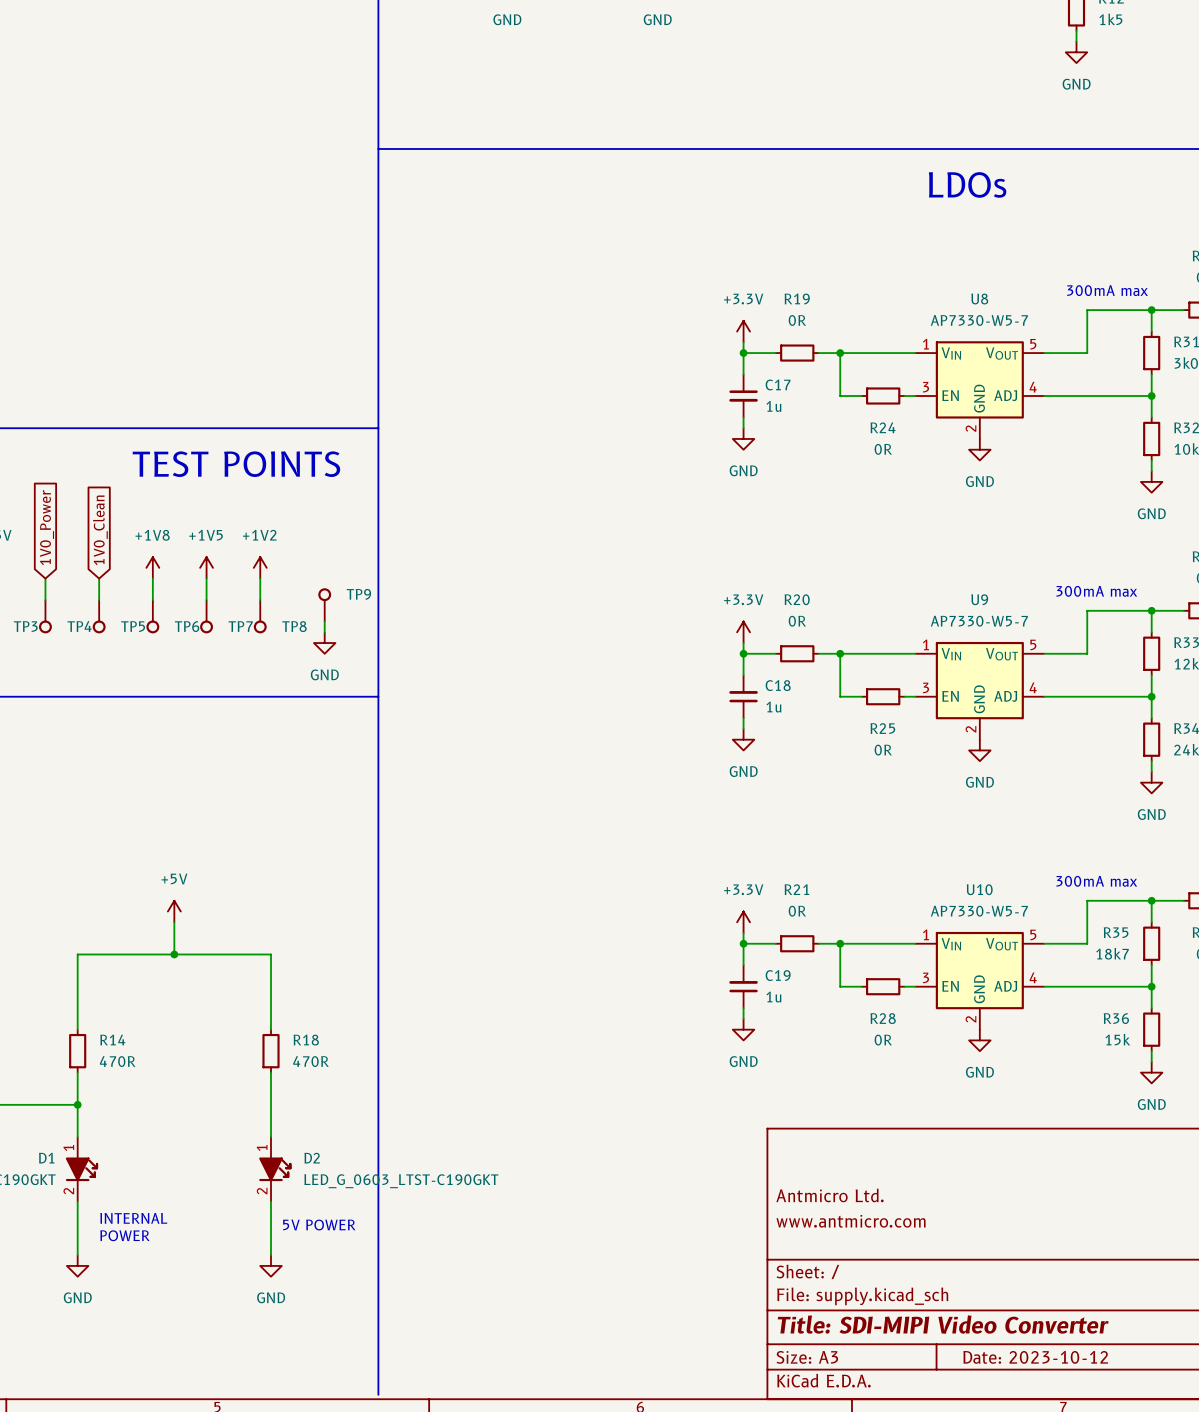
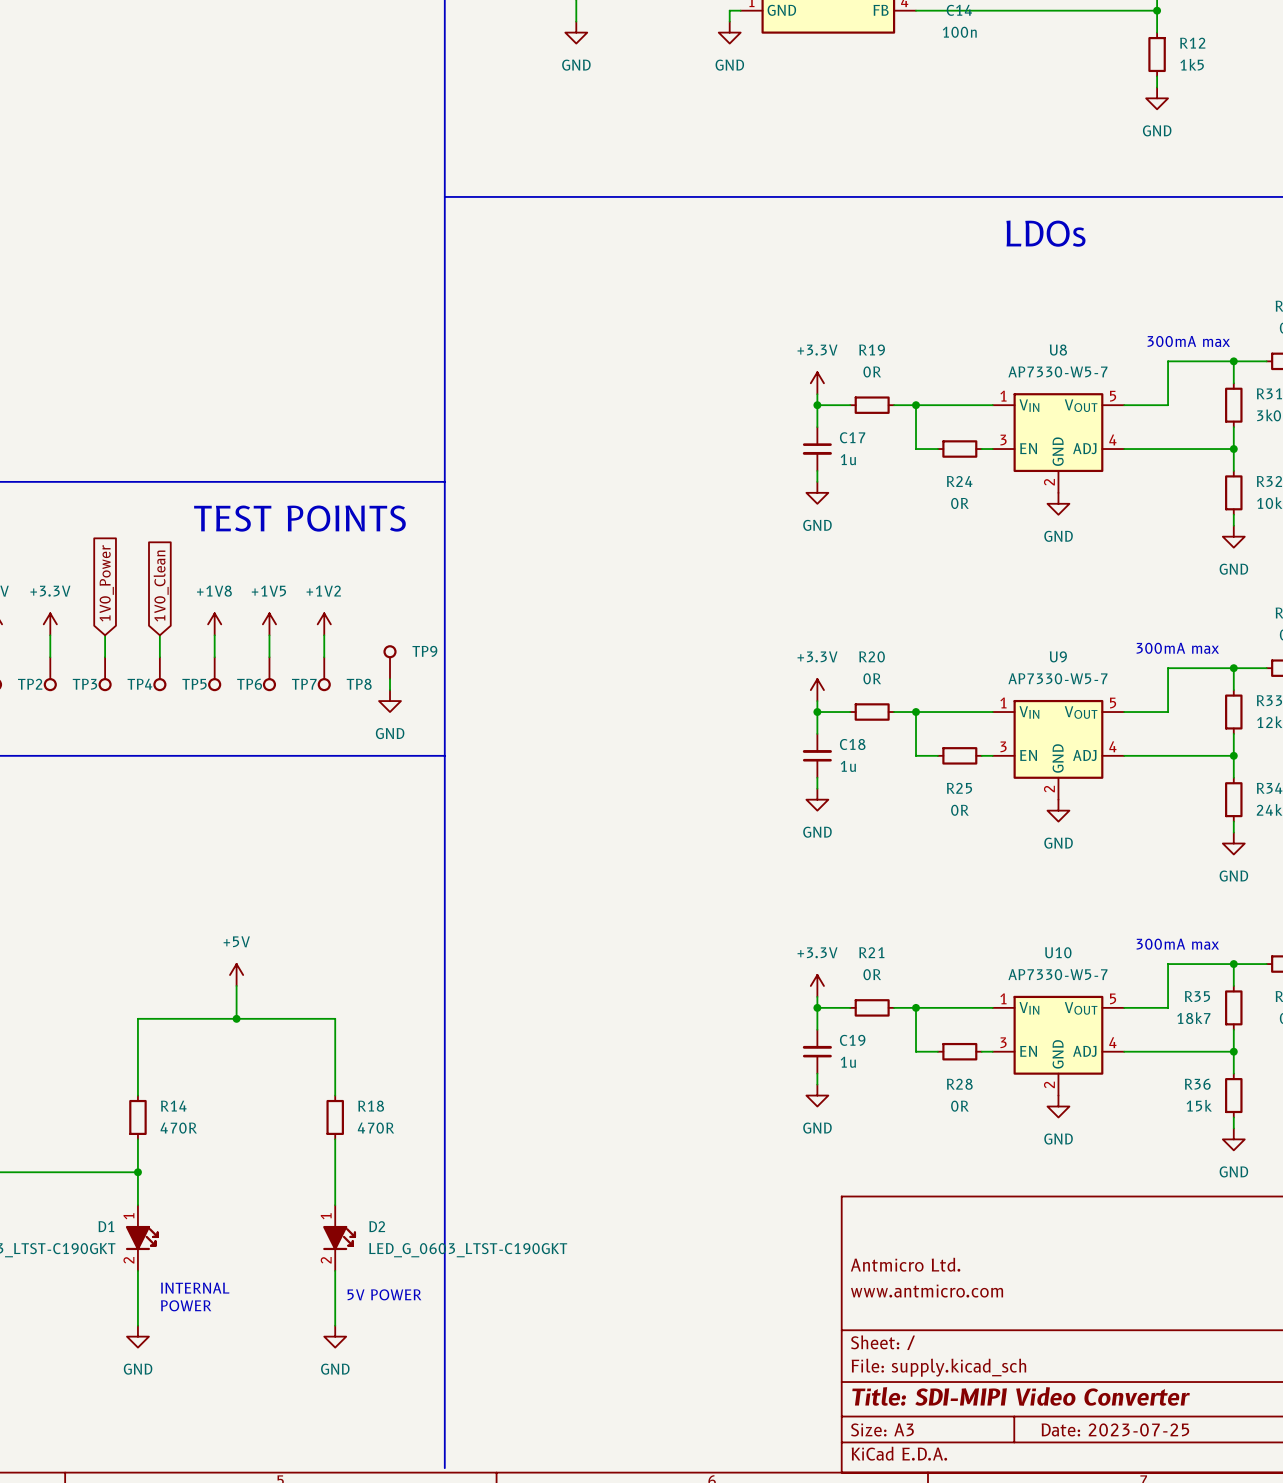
title block: Date: 2023-10-12 (1035, 1357) -> Date: 2023-07-25 (1115, 1429)

